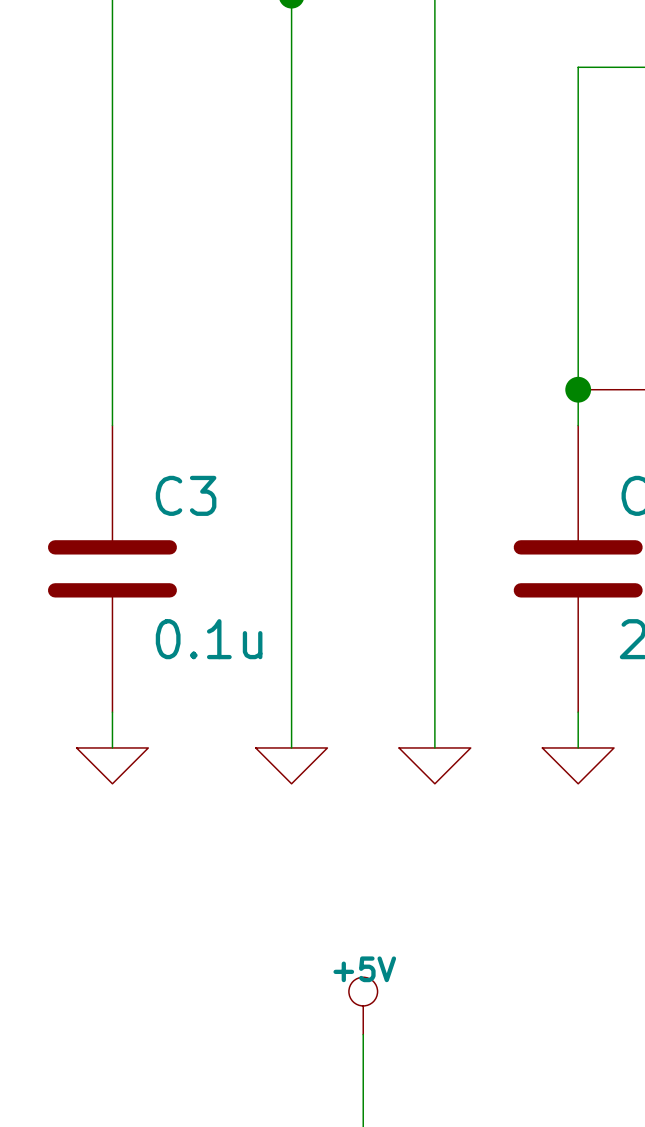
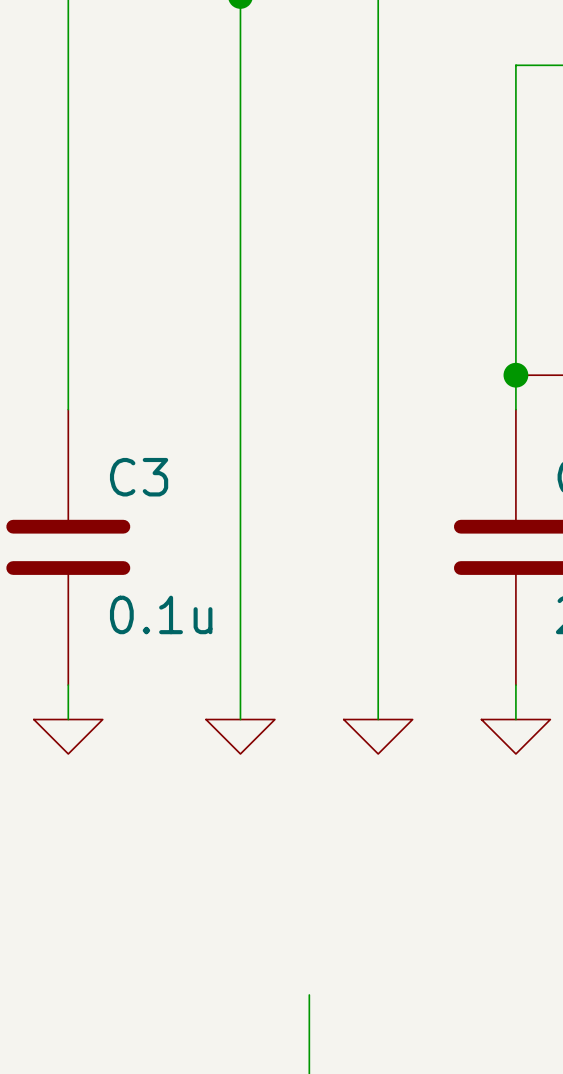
power symbol: +5V (363, 1005) -> none

